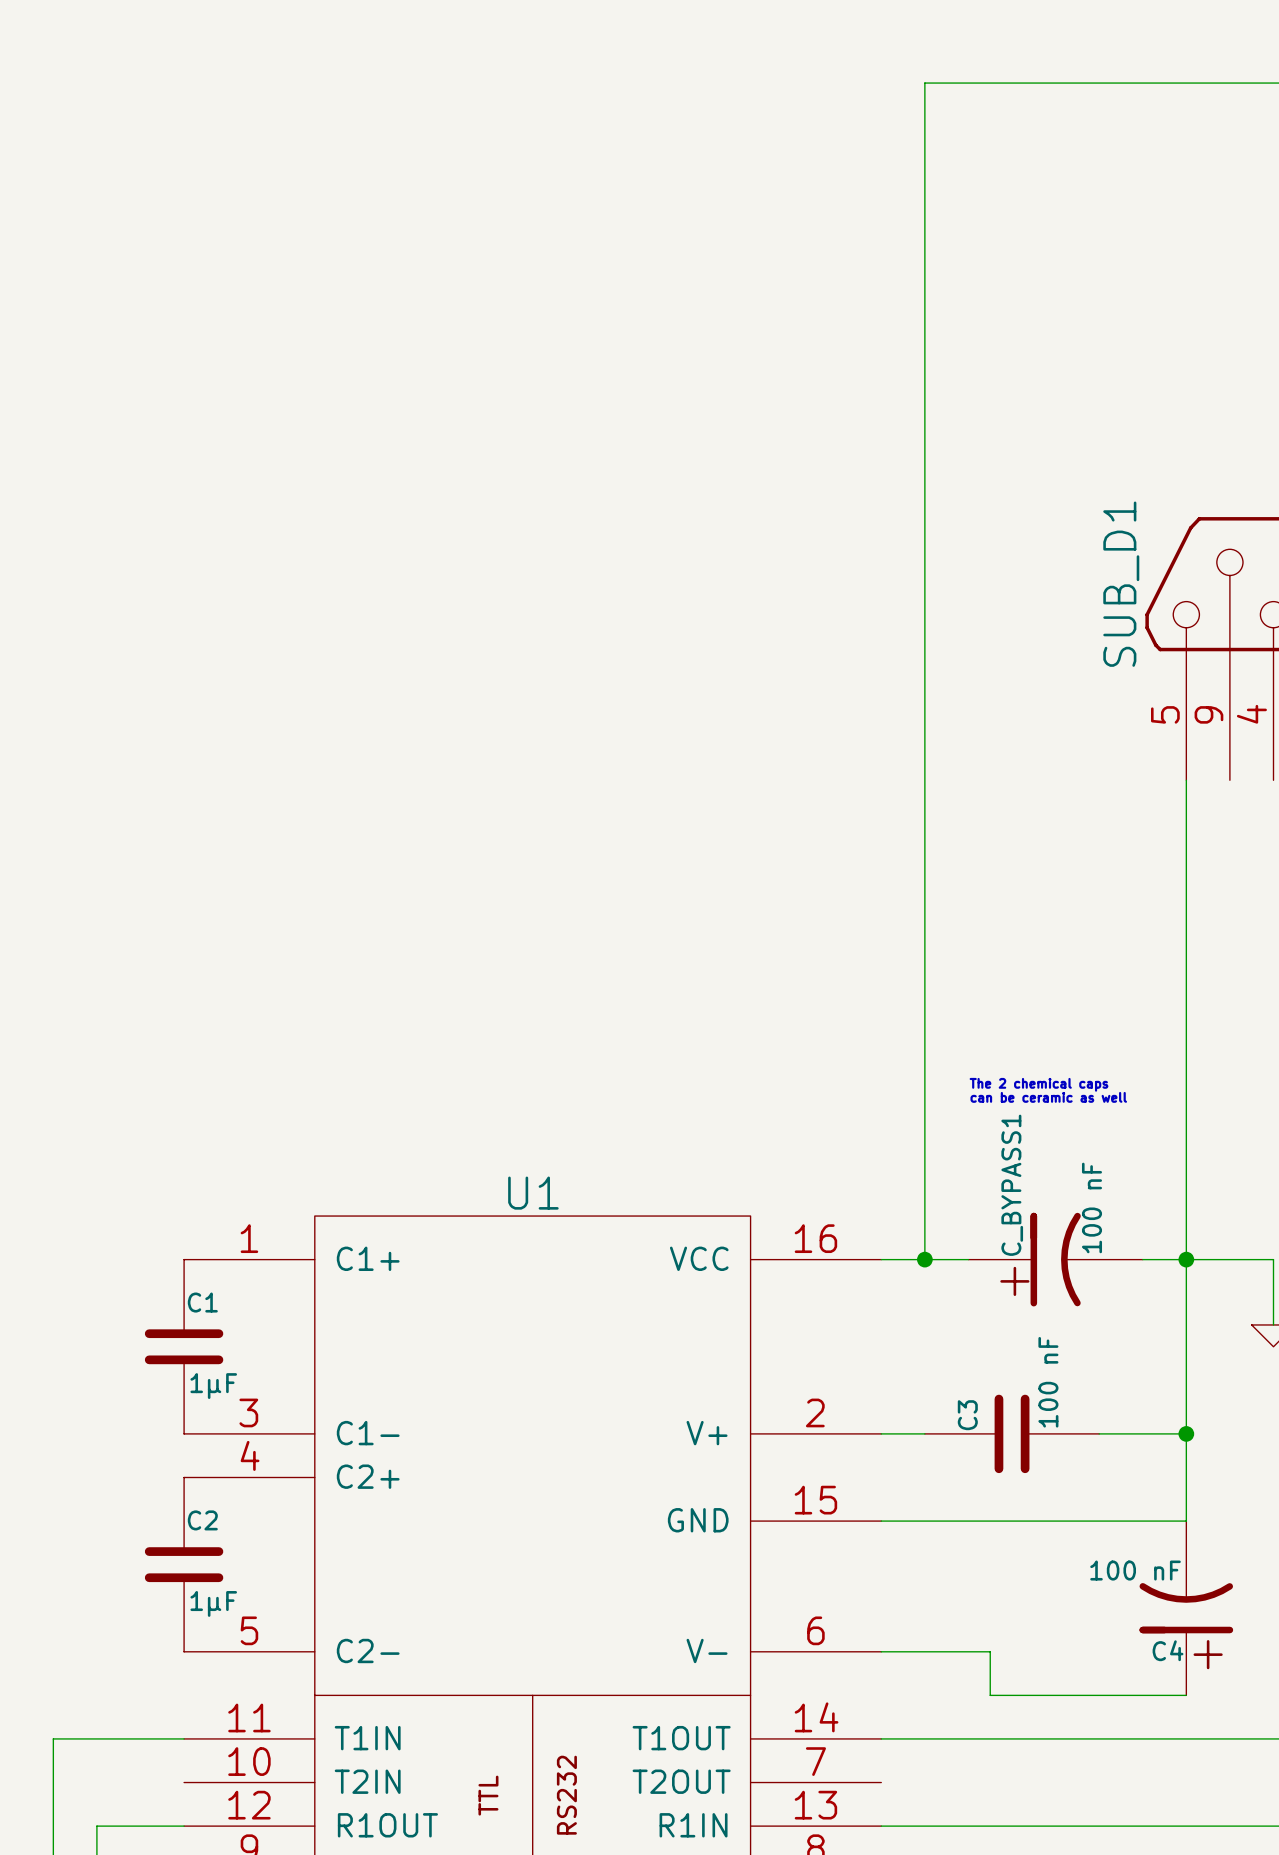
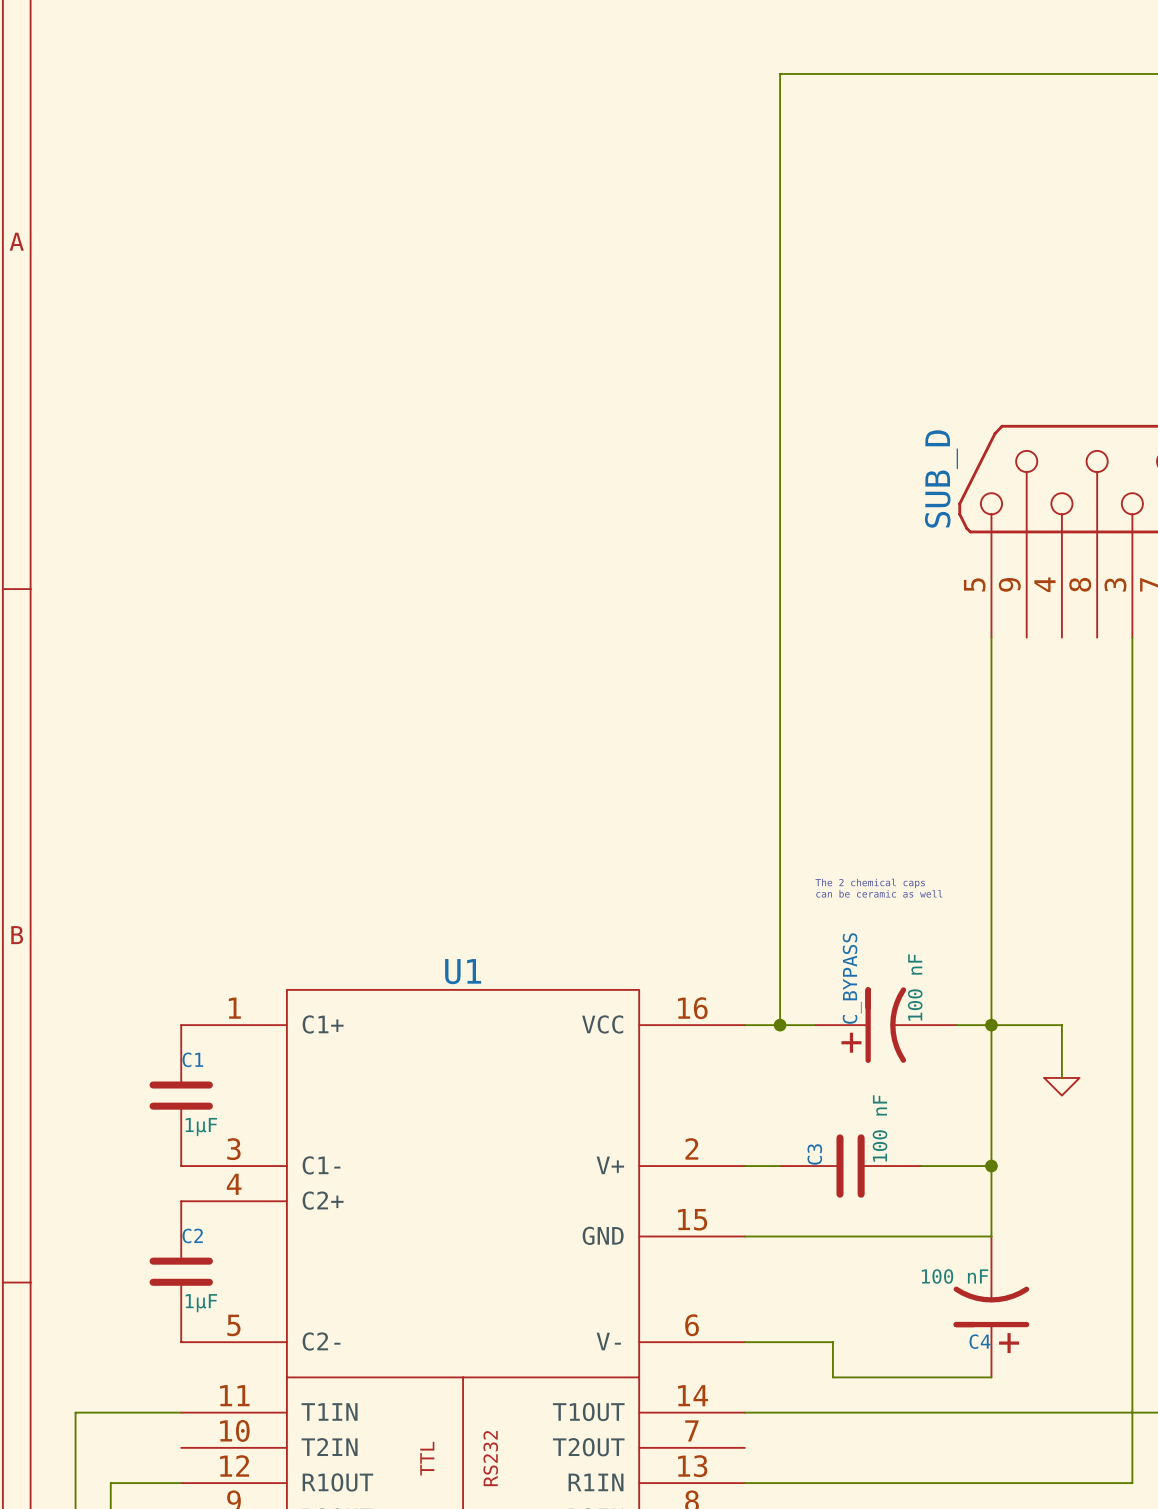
SUB_D1 name: SUB_D1 (1121, 584) -> SUB_D (941, 479)
C_BYPASS1 name: C_BYPASS1 (1012, 1185) -> C_BYPASS (852, 978)

